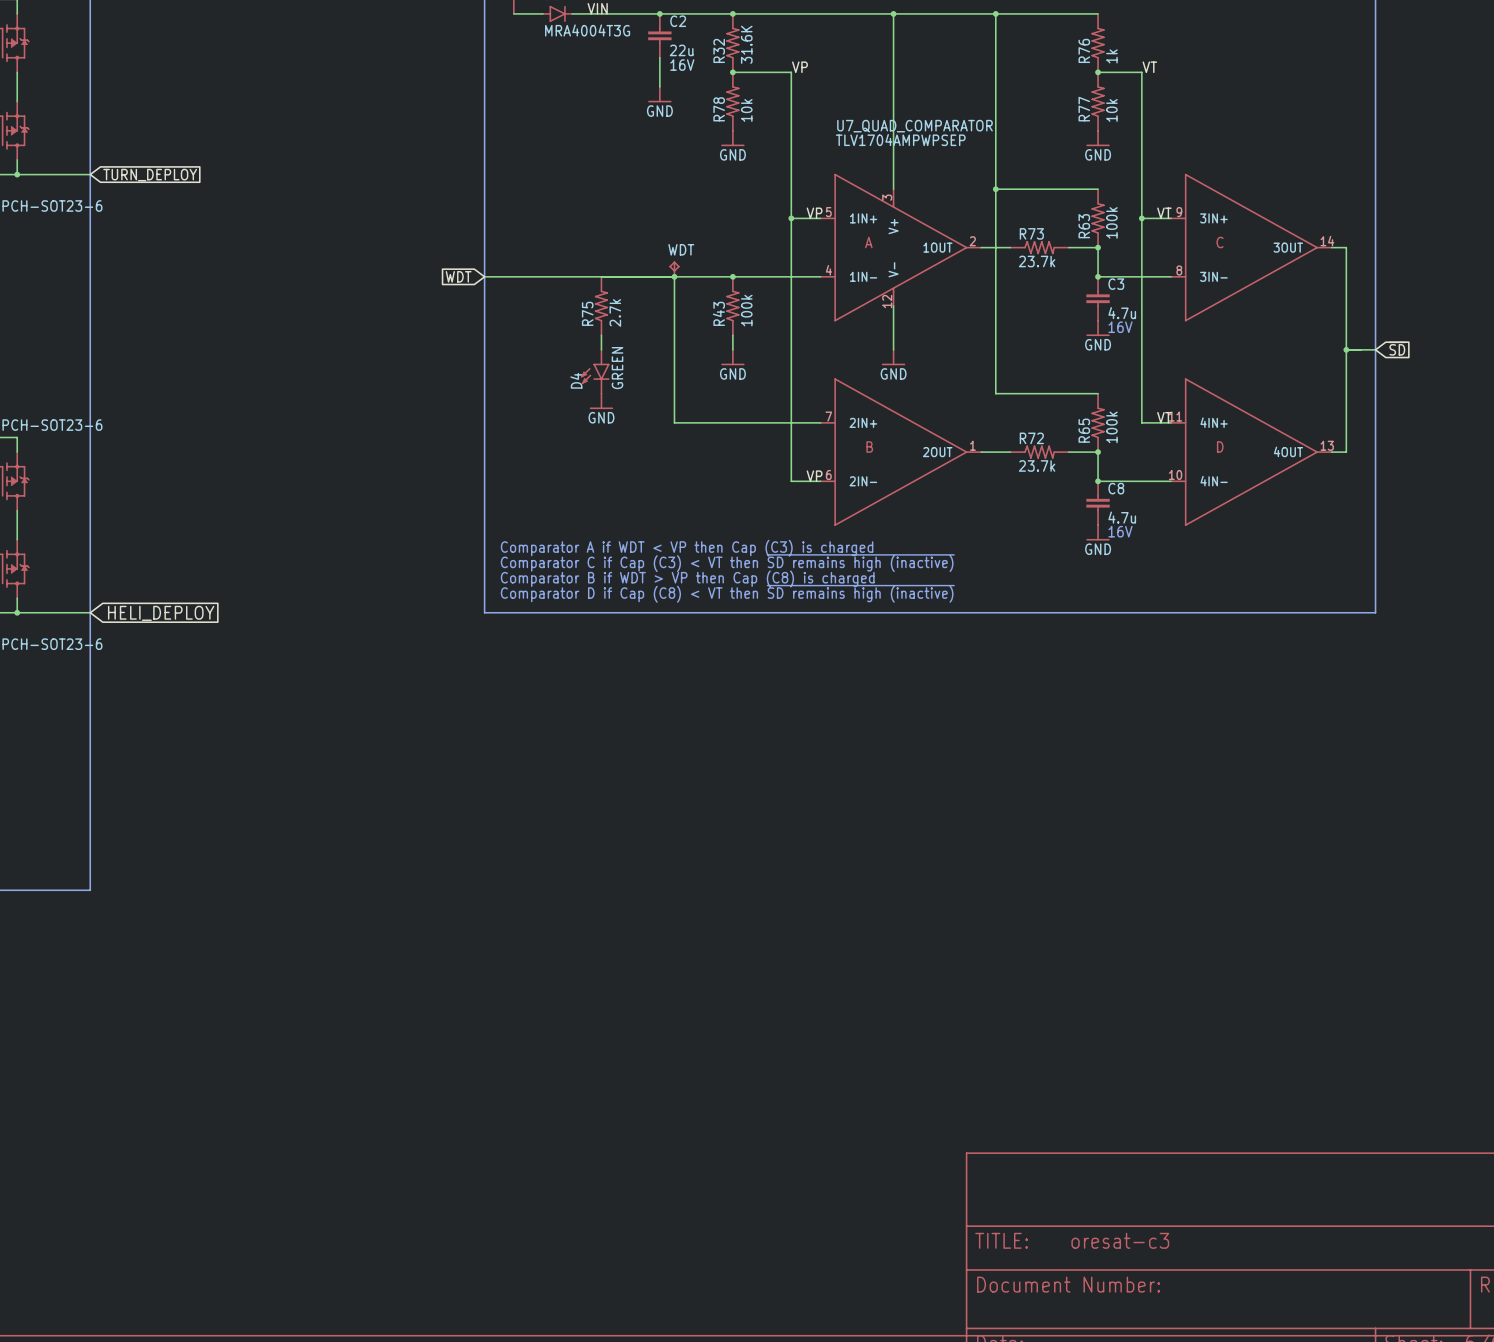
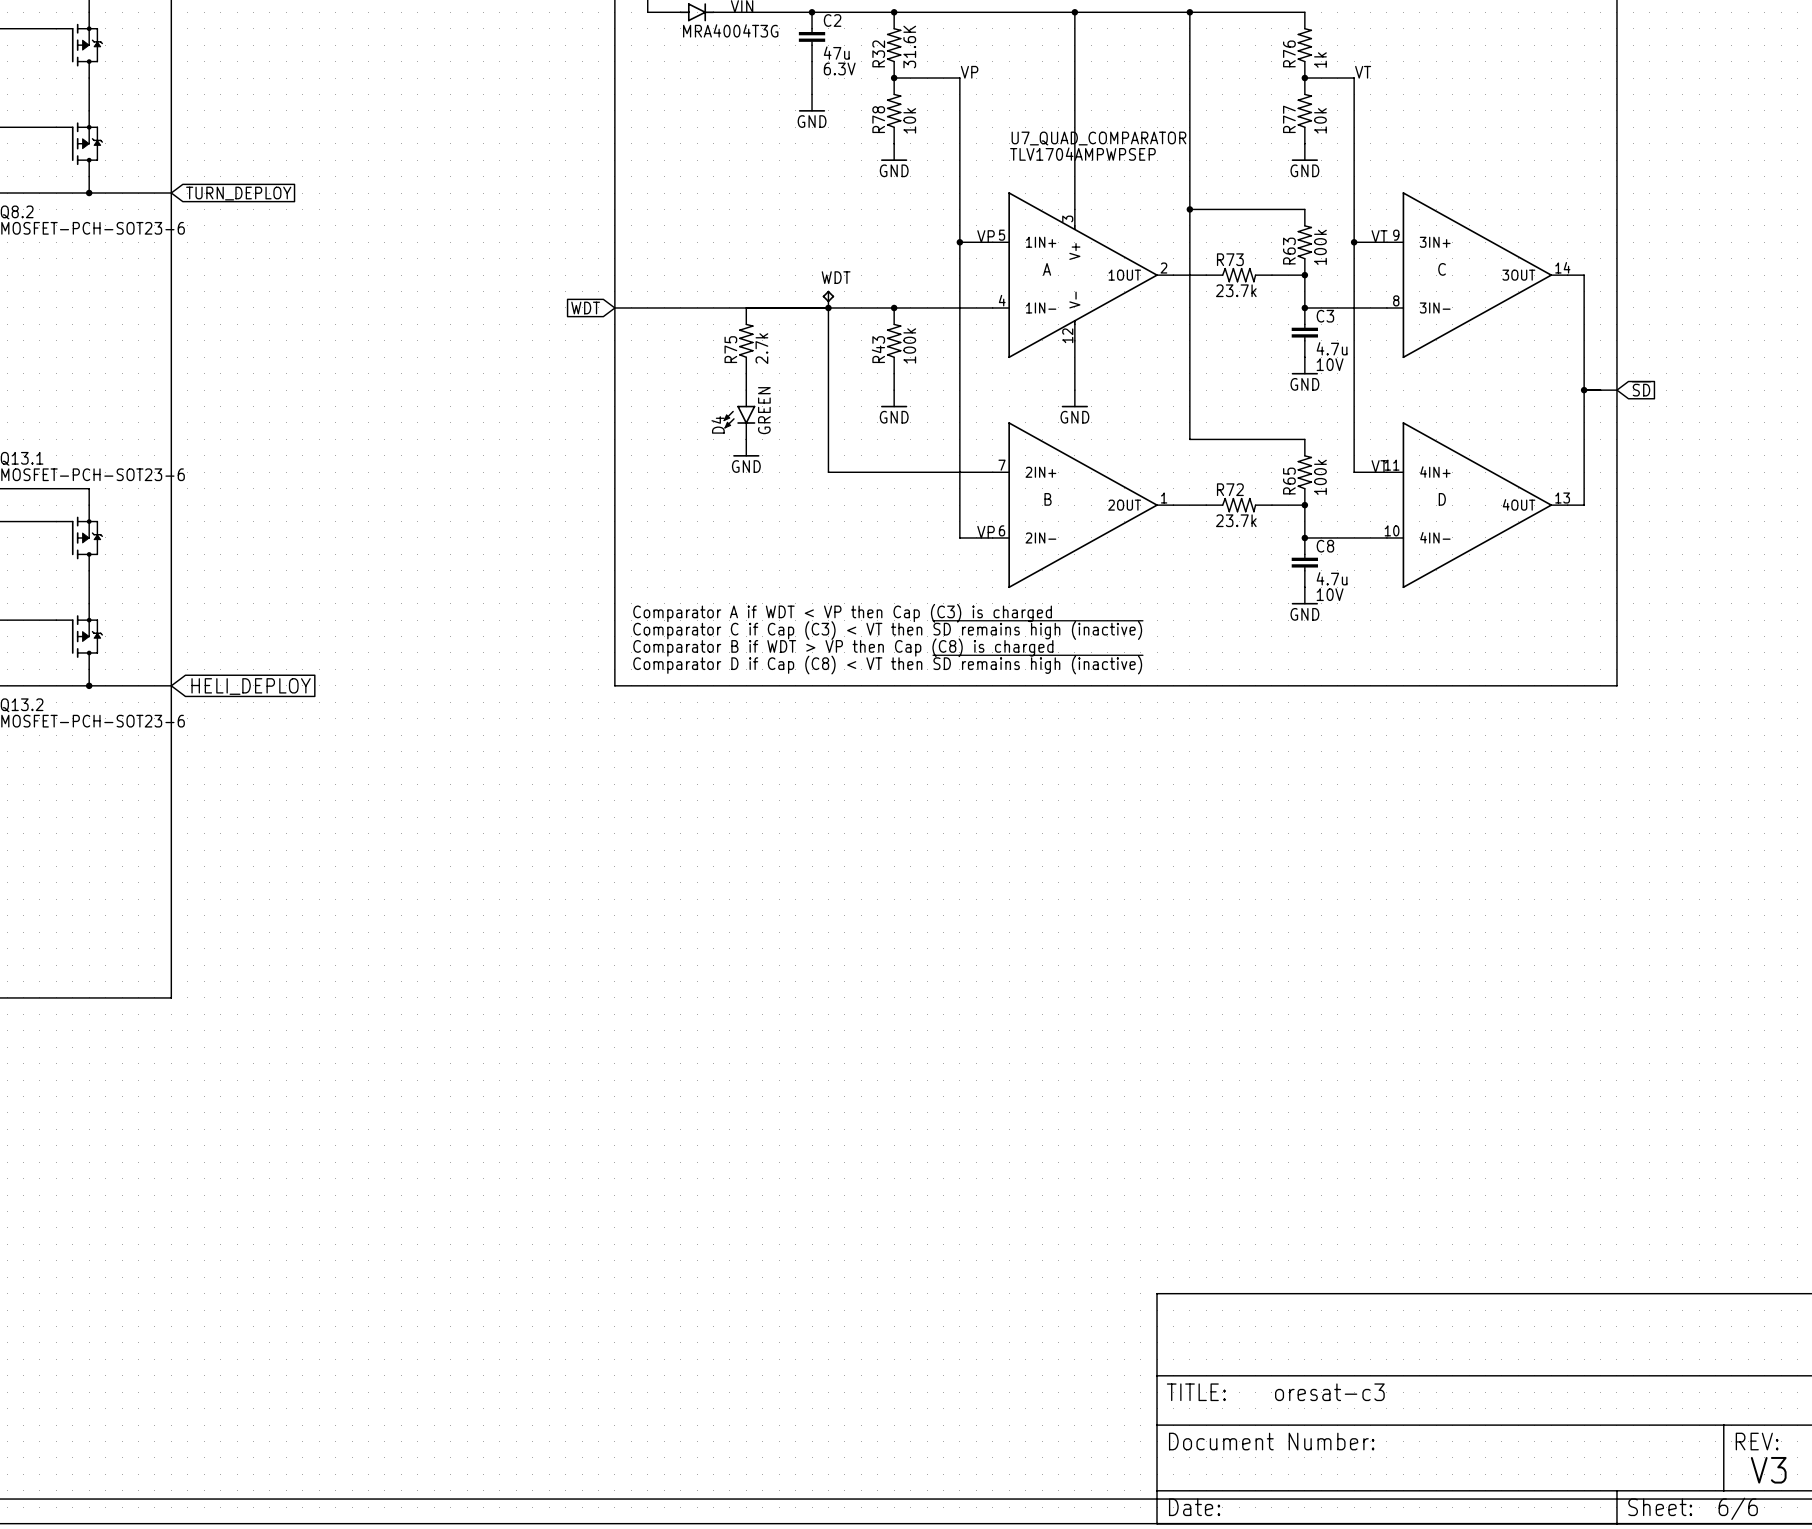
C2 value: 22u (681, 50) -> 47u (836, 53)
C2 text: 16V (682, 65) -> 6.3V (839, 68)
C3 text: 16V (1120, 327) -> 10V (1330, 364)
C8 text: 16V (1120, 531) -> 10V (1330, 594)

